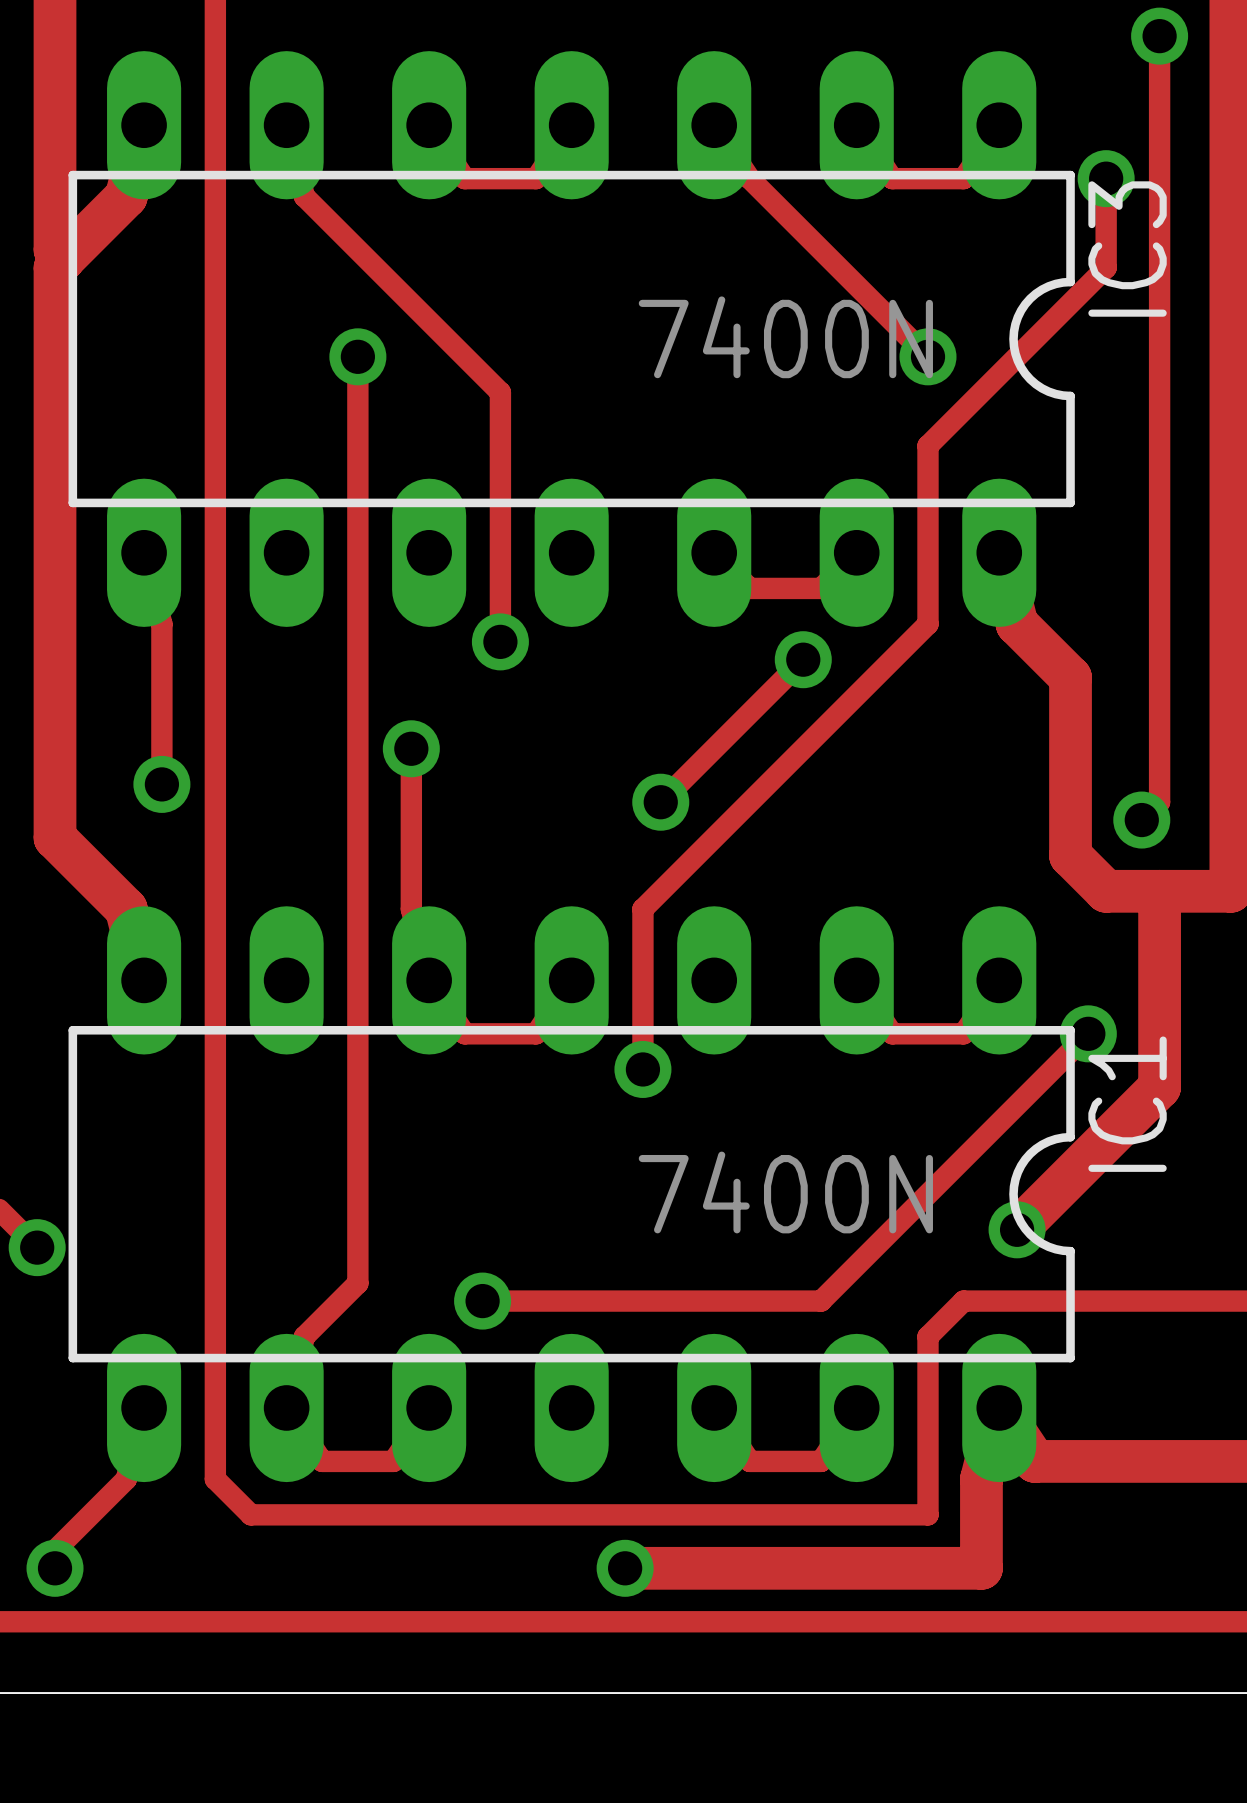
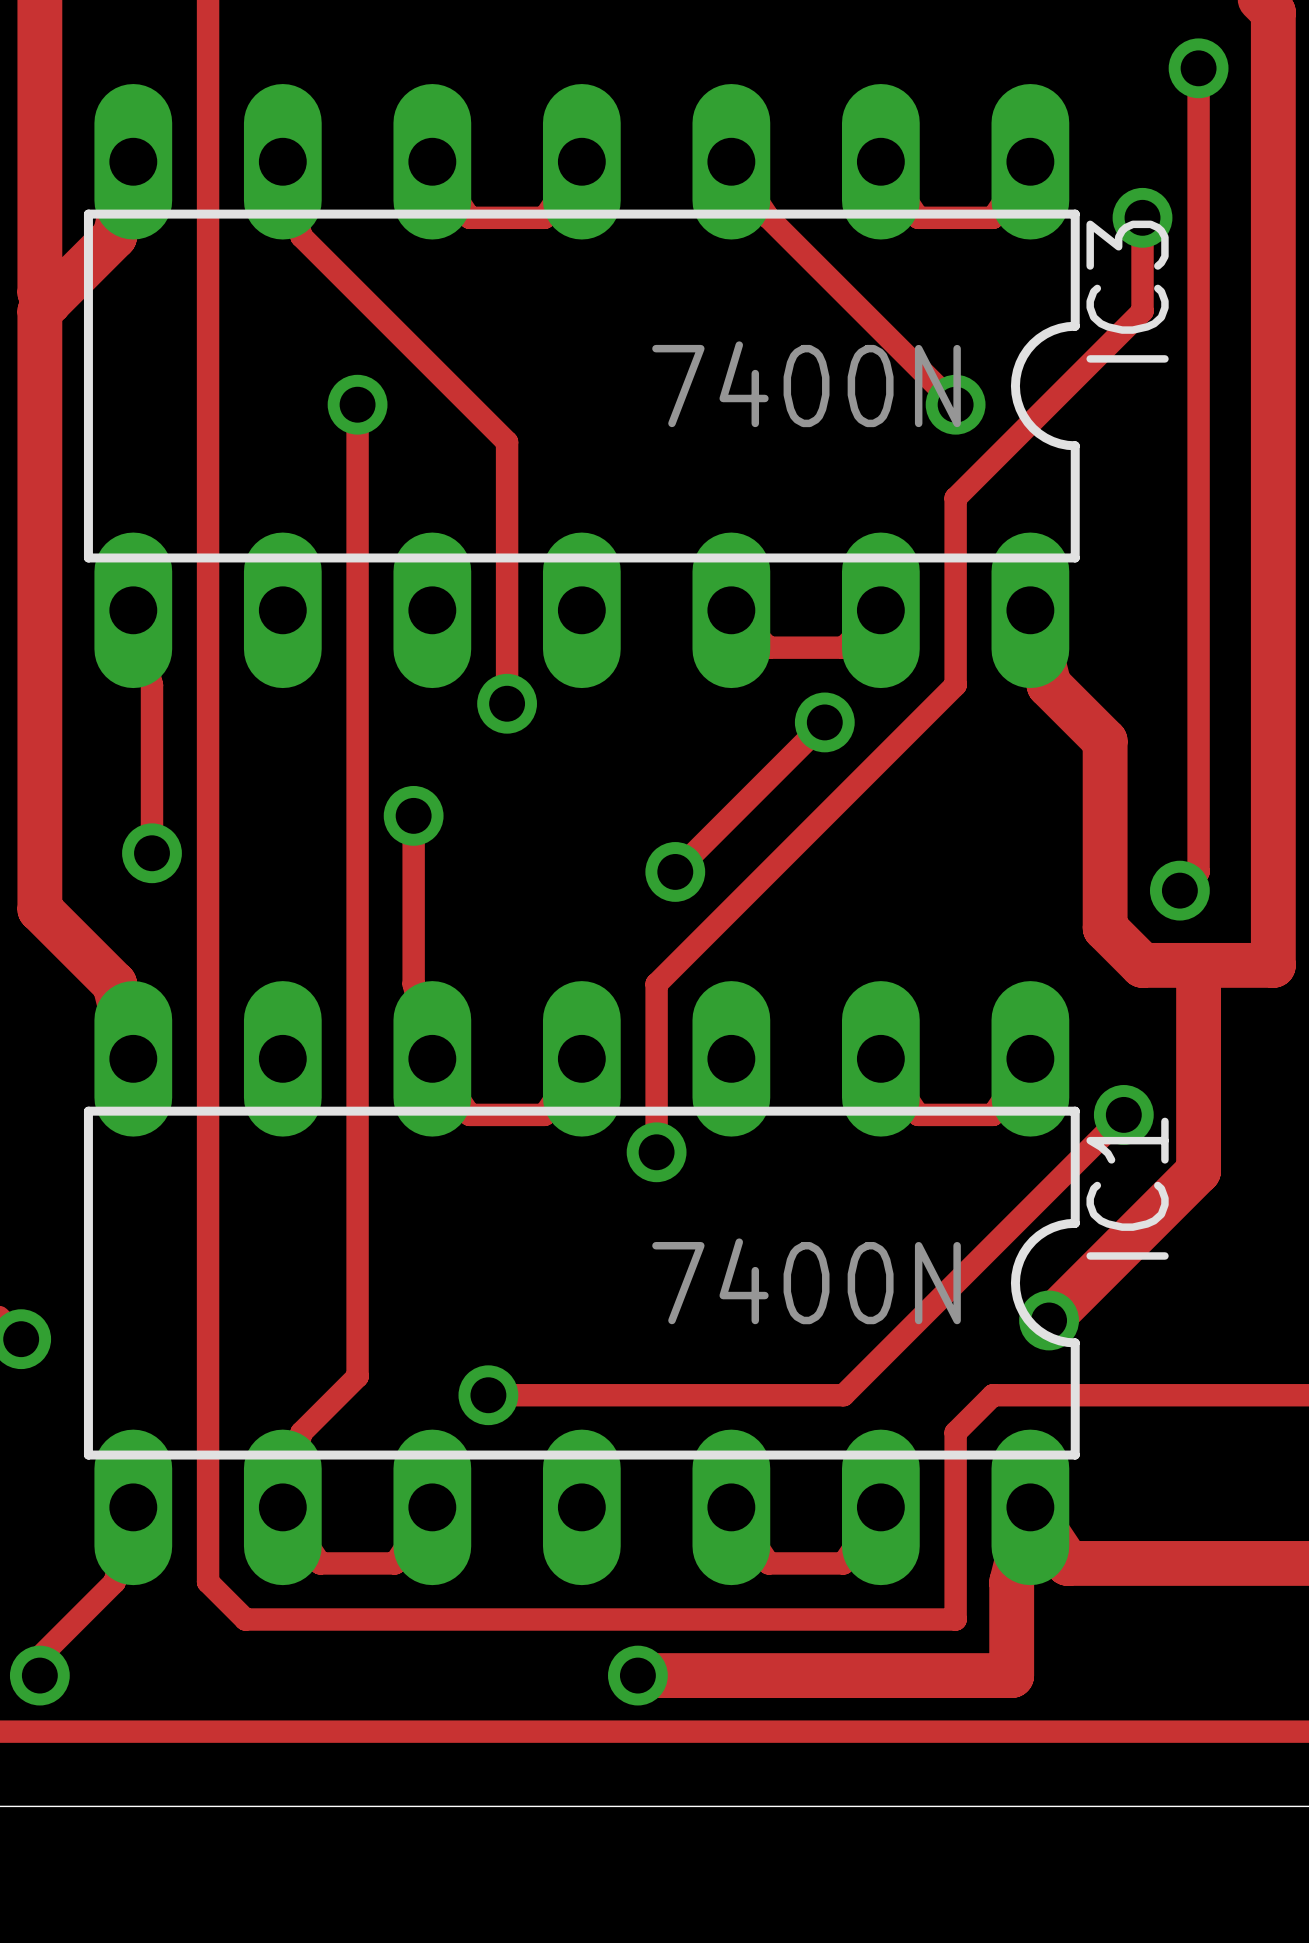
IC3 footprint: [68, 51, 1075, 627] -> [83, 84, 1080, 689]
IC3 name position: IC3 (1127, 249) -> IC3 (1127, 291)
IC1 footprint: [68, 906, 1075, 1483] -> [83, 981, 1080, 1586]
IC1 name position: IC1 (1127, 1104) -> IC1 (1127, 1188)

